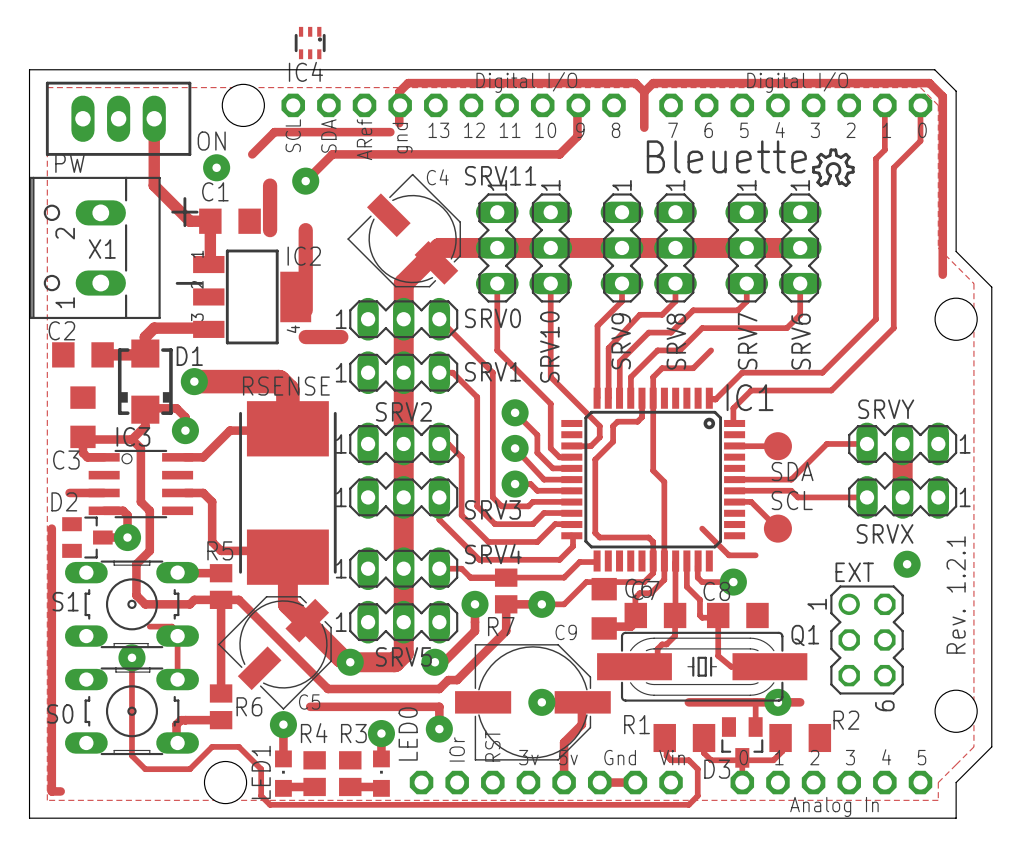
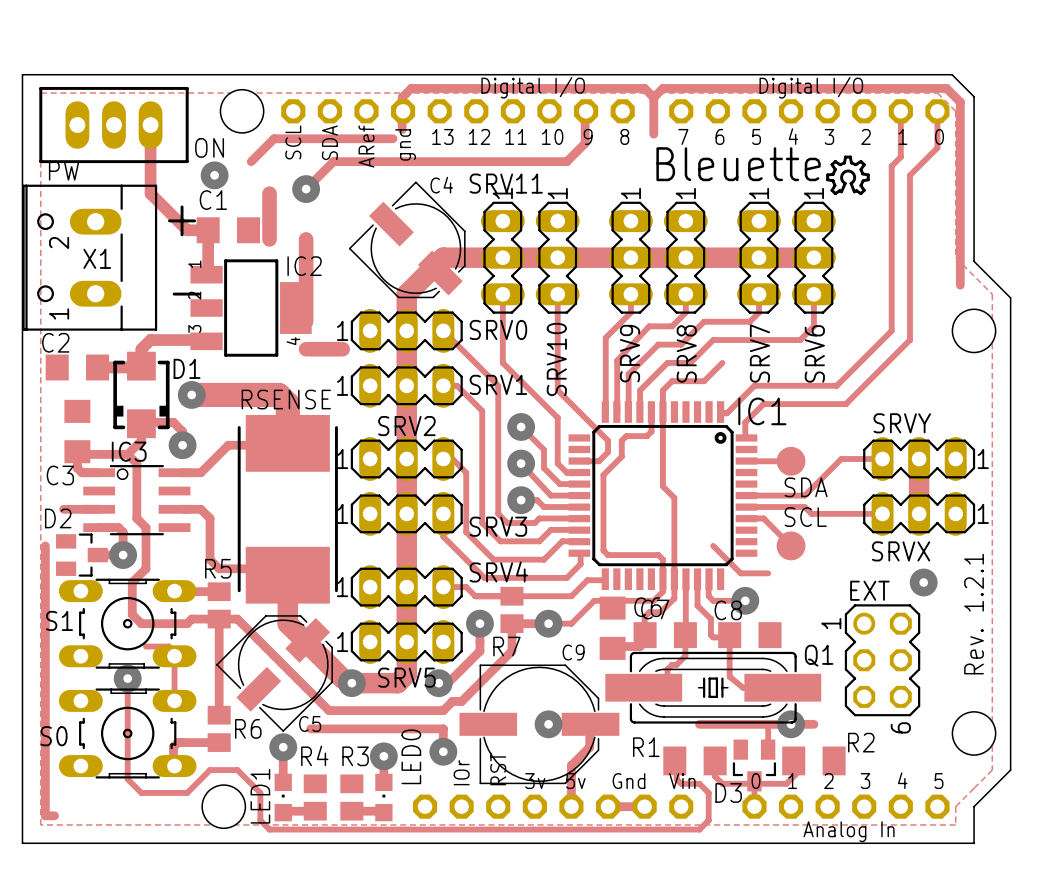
IC4: (310, 43) -> none

